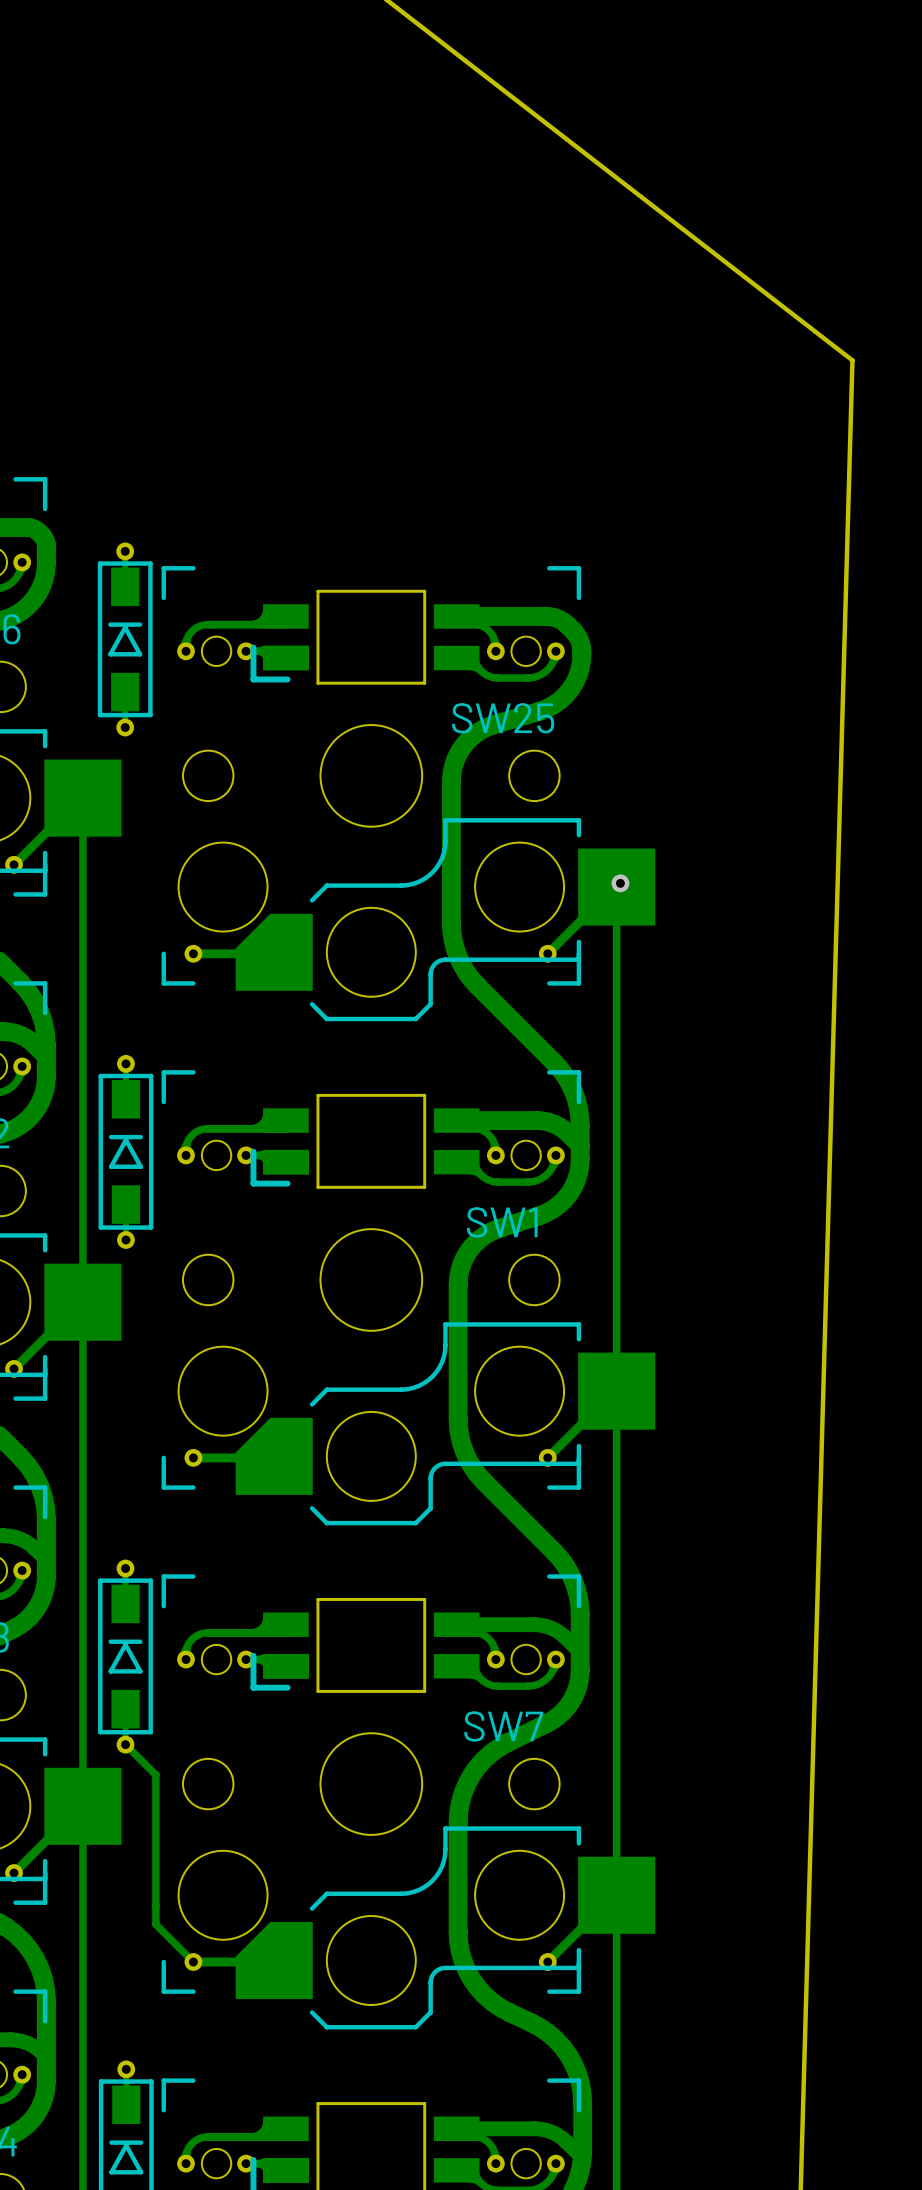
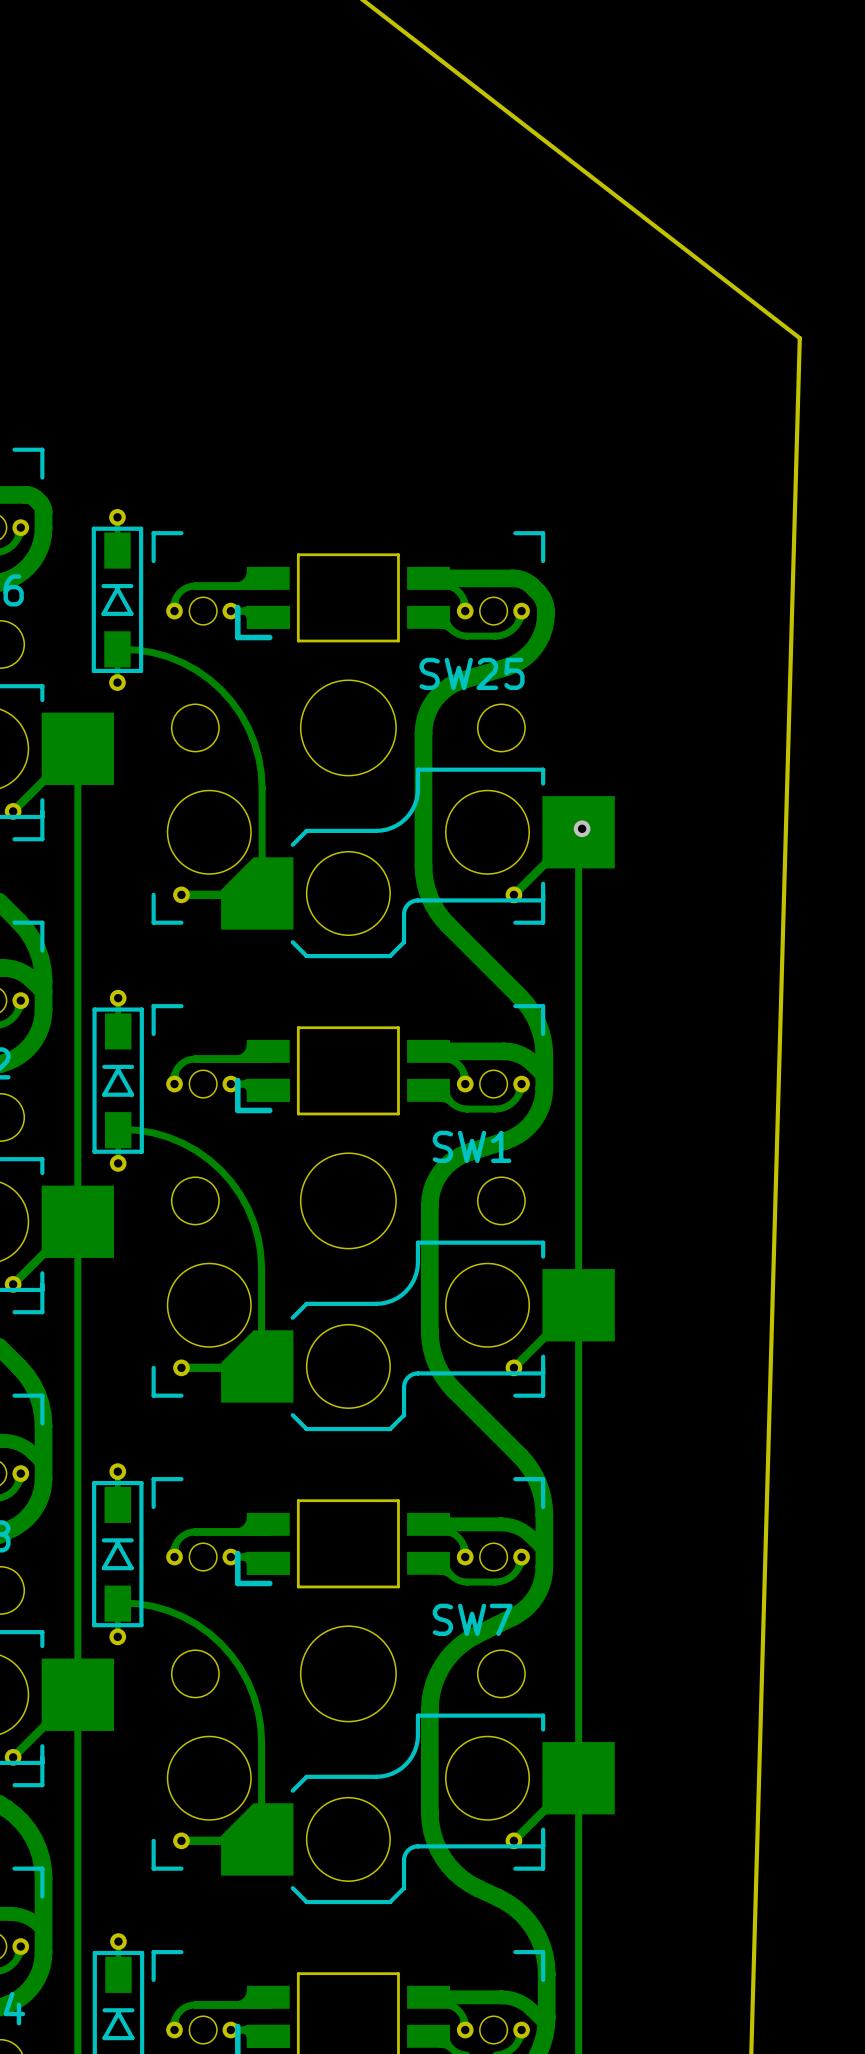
track: none -> (117, 649) (153, 652) (183, 663) (209, 679) (221, 690) (240, 714) (254, 742) (261, 772) (262, 888) (257, 893)
track: none -> (118, 1129) (153, 1132) (182, 1143) (209, 1159) (231, 1181) (240, 1194) (253, 1222) (260, 1253) (261, 1362)
track: none -> (117, 1602) (153, 1606) (182, 1616) (209, 1633) (231, 1655) (240, 1668) (253, 1696) (260, 1726) (261, 1835)
track: (125, 1744) (155, 1775) (155, 1924) (193, 1961) -> none

